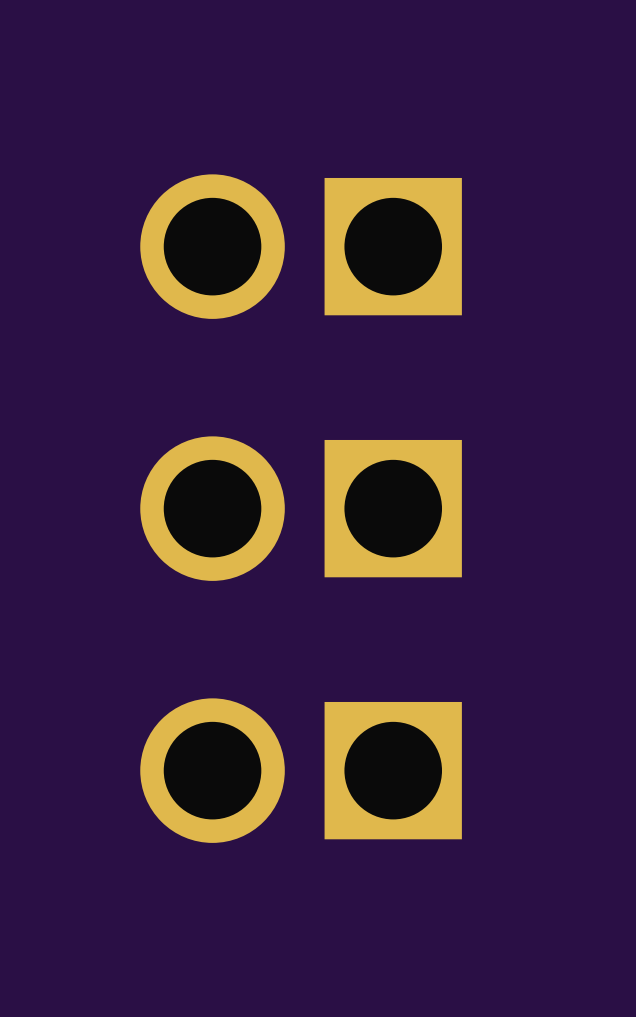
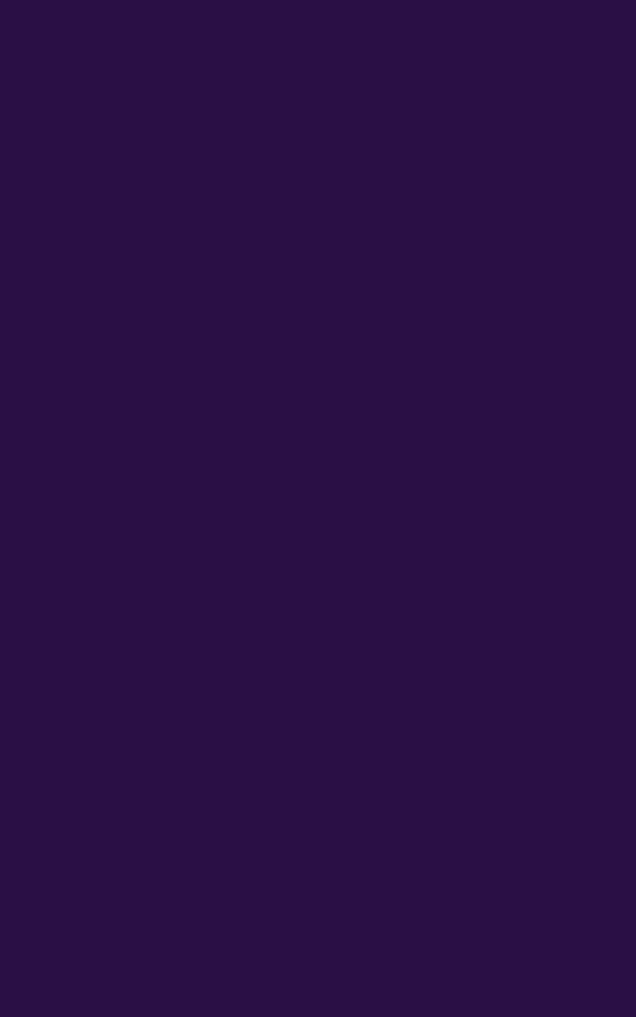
part: (301, 246) -> none
part: (301, 508) -> none
part: (301, 770) -> none

